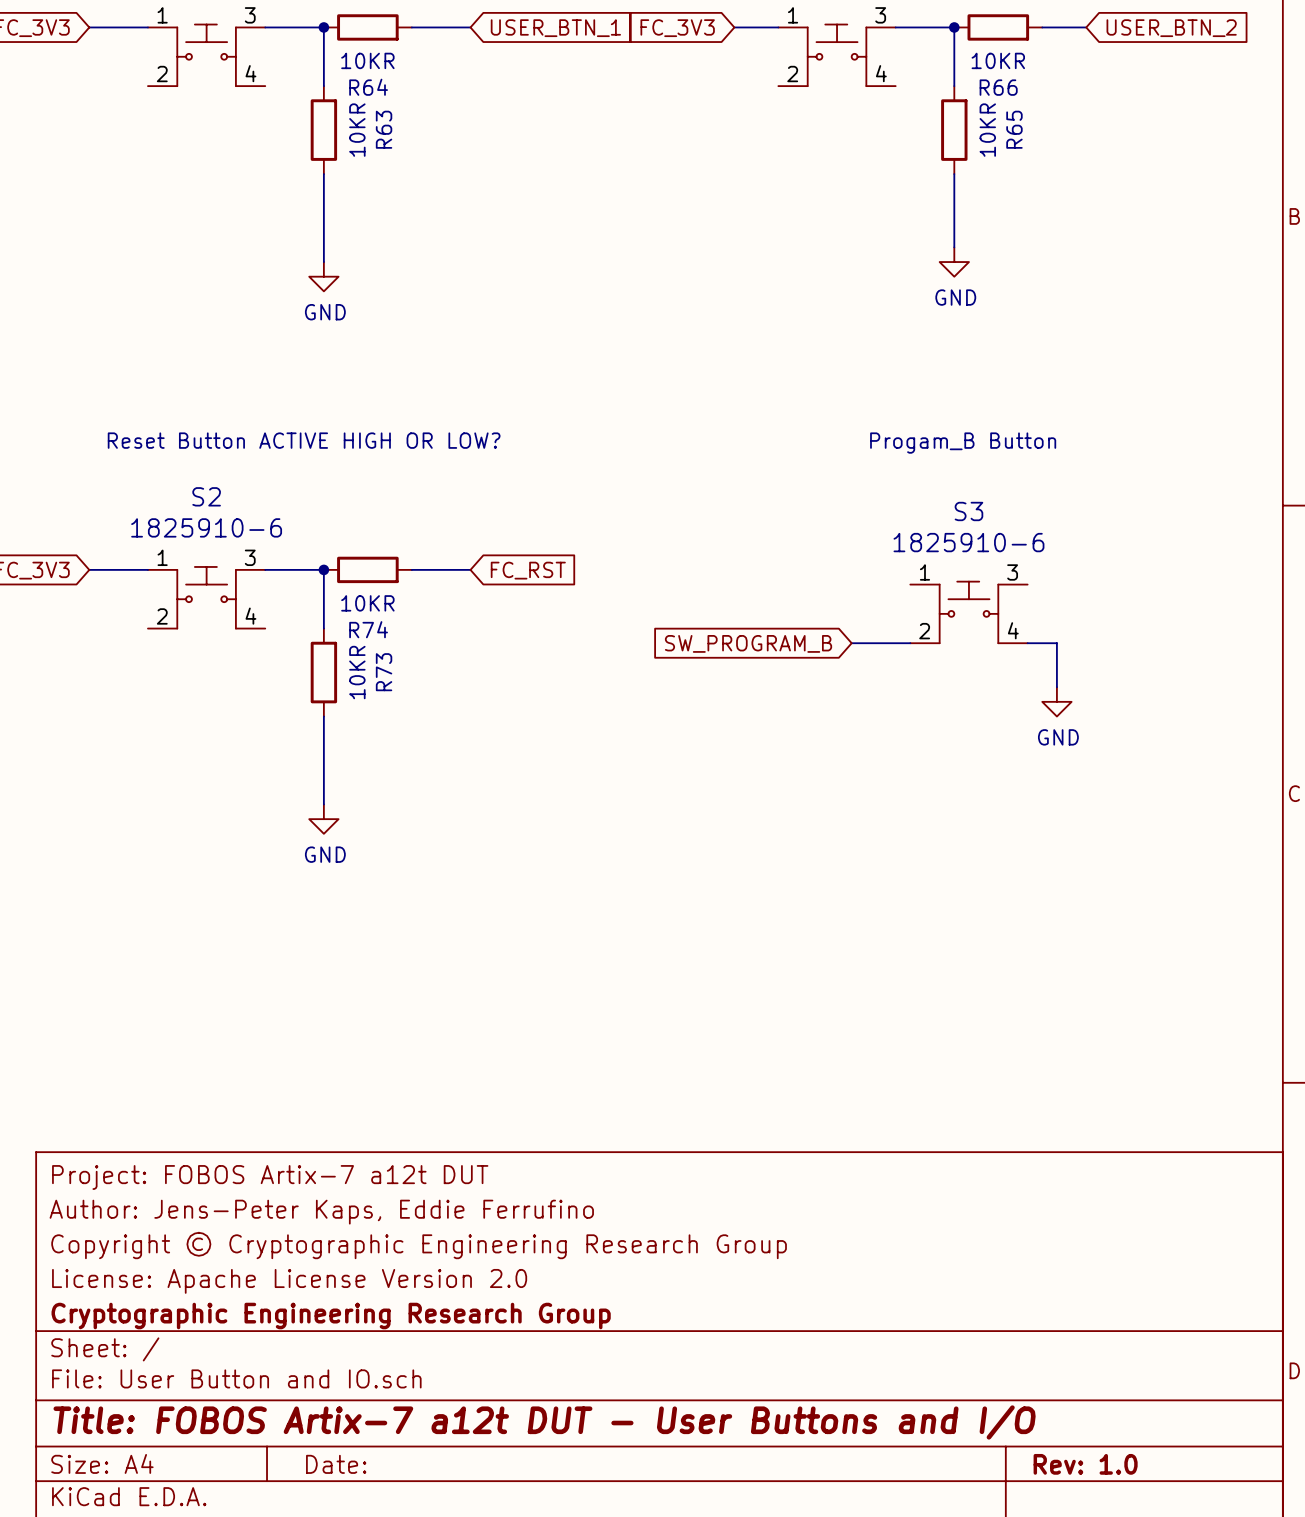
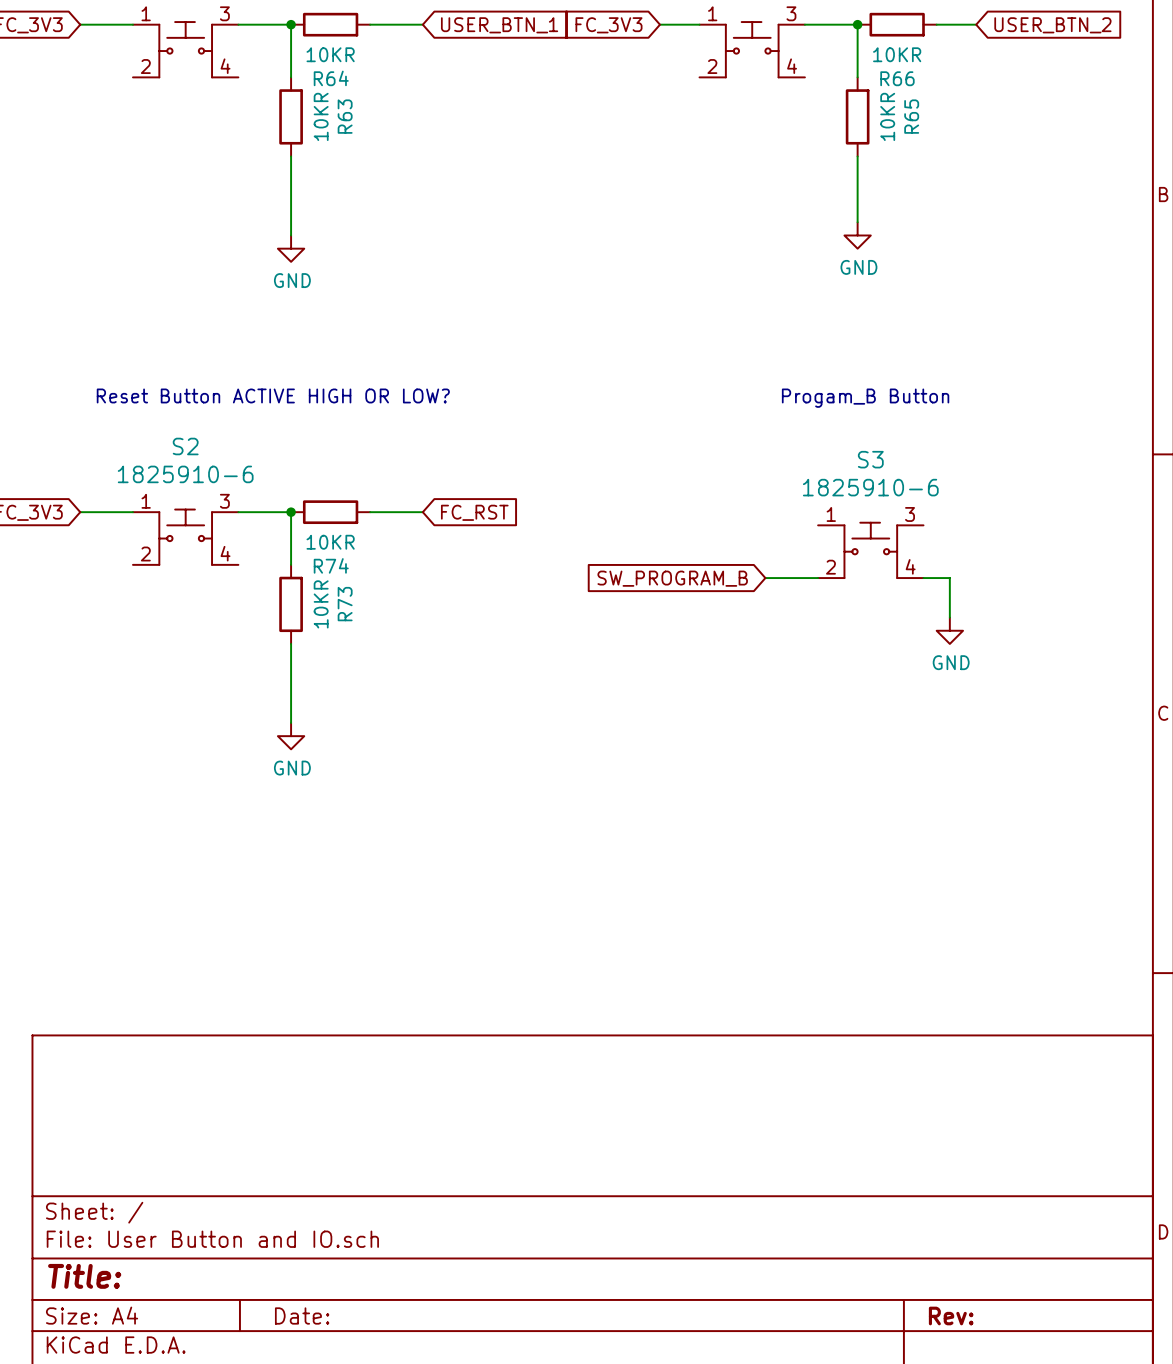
title block: Project: FOBOS Artix-7 a12t DUT (270, 1177) -> none
title block: Author: Jens-Peter Kaps, Eddie Ferrufino (321, 1212) -> none
title block: Copyright © Cryptographic Engineering Research Group (419, 1245) -> none
title block: License: Apache License Version 2.0 (289, 1281) -> none
title block: Cryptographic Engineering Research Group (331, 1316) -> none
title block: Title: FOBOS Artix-7 a12t DUT - User Buttons and I/O (544, 1422) -> Title: (84, 1276)
title block: Rev: 1.0 (1085, 1464) -> Rev: (951, 1315)

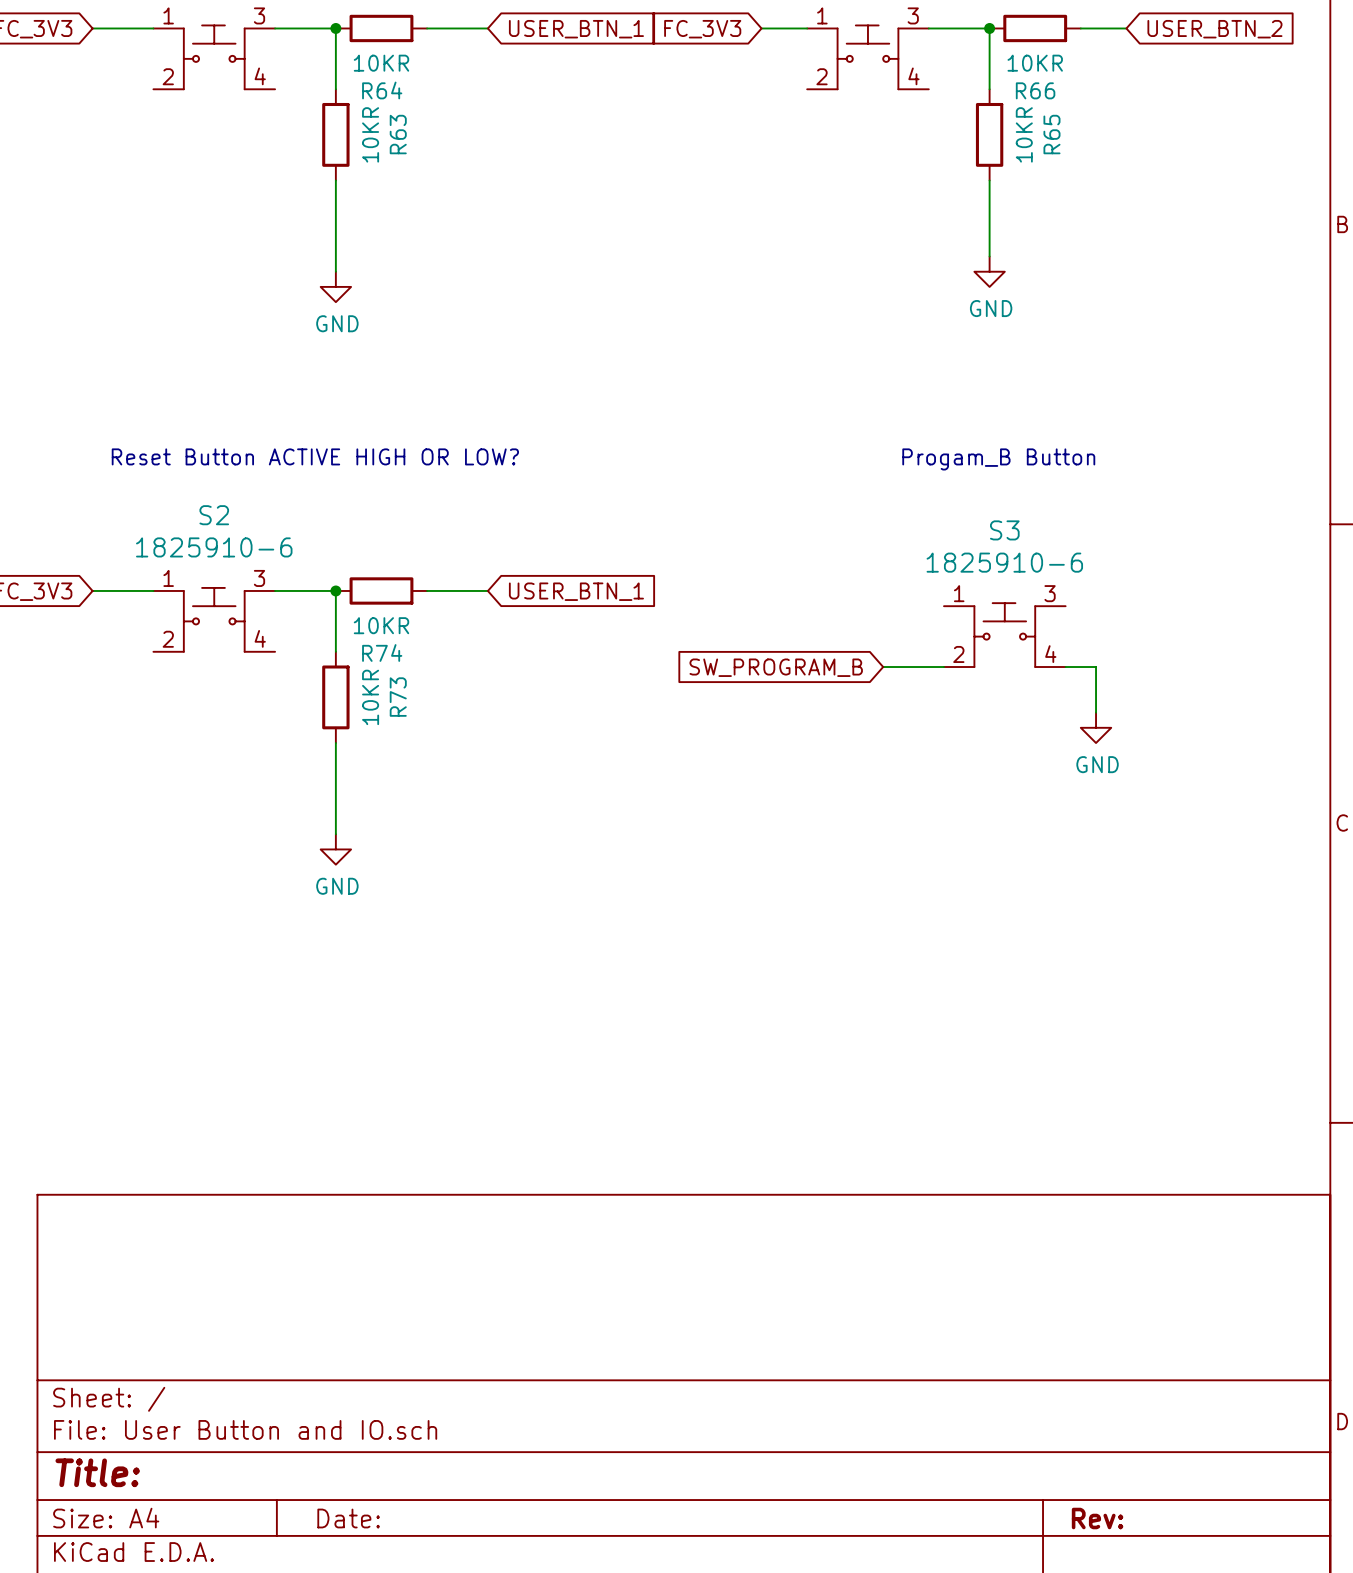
global label: FC_RST (474, 512) -> USER_BTN_1 (576, 591)

